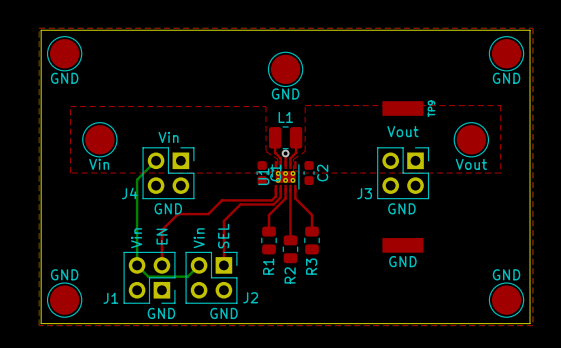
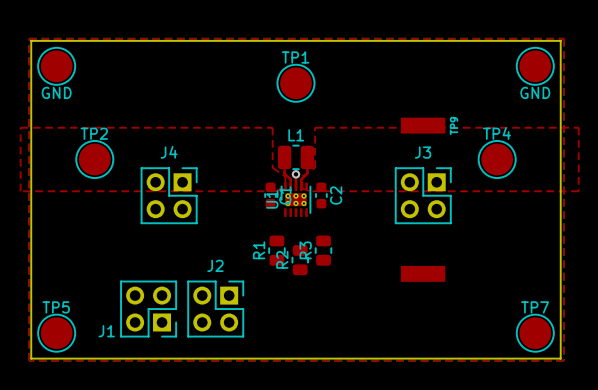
TP1 name: none -> TP1 (295, 57)
TP1 value: GND (285, 93) -> none
top zone outline: (305, 105) (305, 151) (293, 159) (293, 171) (299, 173) (500, 173) (500, 105) (305, 105) -> (315, 127) (315, 167) (302, 176) (302, 189) (308, 191) (578, 191) (578, 127) (315, 127)
top zone outline: (70, 106) (70, 173) (269, 173) (277, 171) (277, 159) (266, 151) (266, 106) (70, 106) -> (20, 127) (20, 191) (276, 191) (279, 189) (285, 189) (285, 176) (272, 167) (272, 127) (20, 127)
TP2 name: none -> TP2 (94, 133)
TP4 name: none -> TP4 (496, 133)
text: Vout (402, 131) -> none
text: Vin (168, 137) -> none
bottom track: (156, 160) (137, 179) (137, 265) (148, 276) (187, 276) (199, 265) -> none
TP2 value: Vin (99, 164) -> none
TP4 value: Vout (471, 164) -> none
top track: (275, 188) (275, 196) (271, 200) (222, 200) (208, 214) (178, 214) (161, 230) (161, 265) -> none
top track: (280, 188) (280, 197) (273, 204) (240, 204) (223, 221) (223, 265) -> none
top track: (285, 188) (285, 198) (268, 215) (268, 231) -> none
top track: (290, 188) (290, 240) -> none
top track: (295, 188) (295, 198) (311, 215) (311, 231) -> none
J4 name position: J4 (129, 193) -> J4 (169, 152)
J3 name position: J3 (364, 193) -> J3 (423, 152)
text: GND (168, 208) -> none
text: GND (401, 208) -> none
text: EN (162, 236) -> none
text: SEL (223, 236) -> none
text: Vin (136, 238) -> none
text: Vin (199, 238) -> none
R1 position: (268, 240) -> (276, 250)
R3 position: (311, 240) -> (323, 250)
R2 position: (290, 249) -> (300, 260)
part text: GND (402, 261) -> none
R1 name position: R1 (268, 266) -> R1 (259, 250)
R3 name position: R3 (311, 266) -> R3 (305, 250)
TP5 value: GND (64, 274) -> none
TP7 value: GND (506, 274) -> none
R2 name position: R2 (290, 275) -> R2 (282, 259)
TP5 name: none -> TP5 (56, 307)
TP7 name: none -> TP7 (535, 307)
J2 name position: J2 (250, 297) -> J2 (215, 265)
text: GND (161, 313) -> none
text: GND (224, 313) -> none

